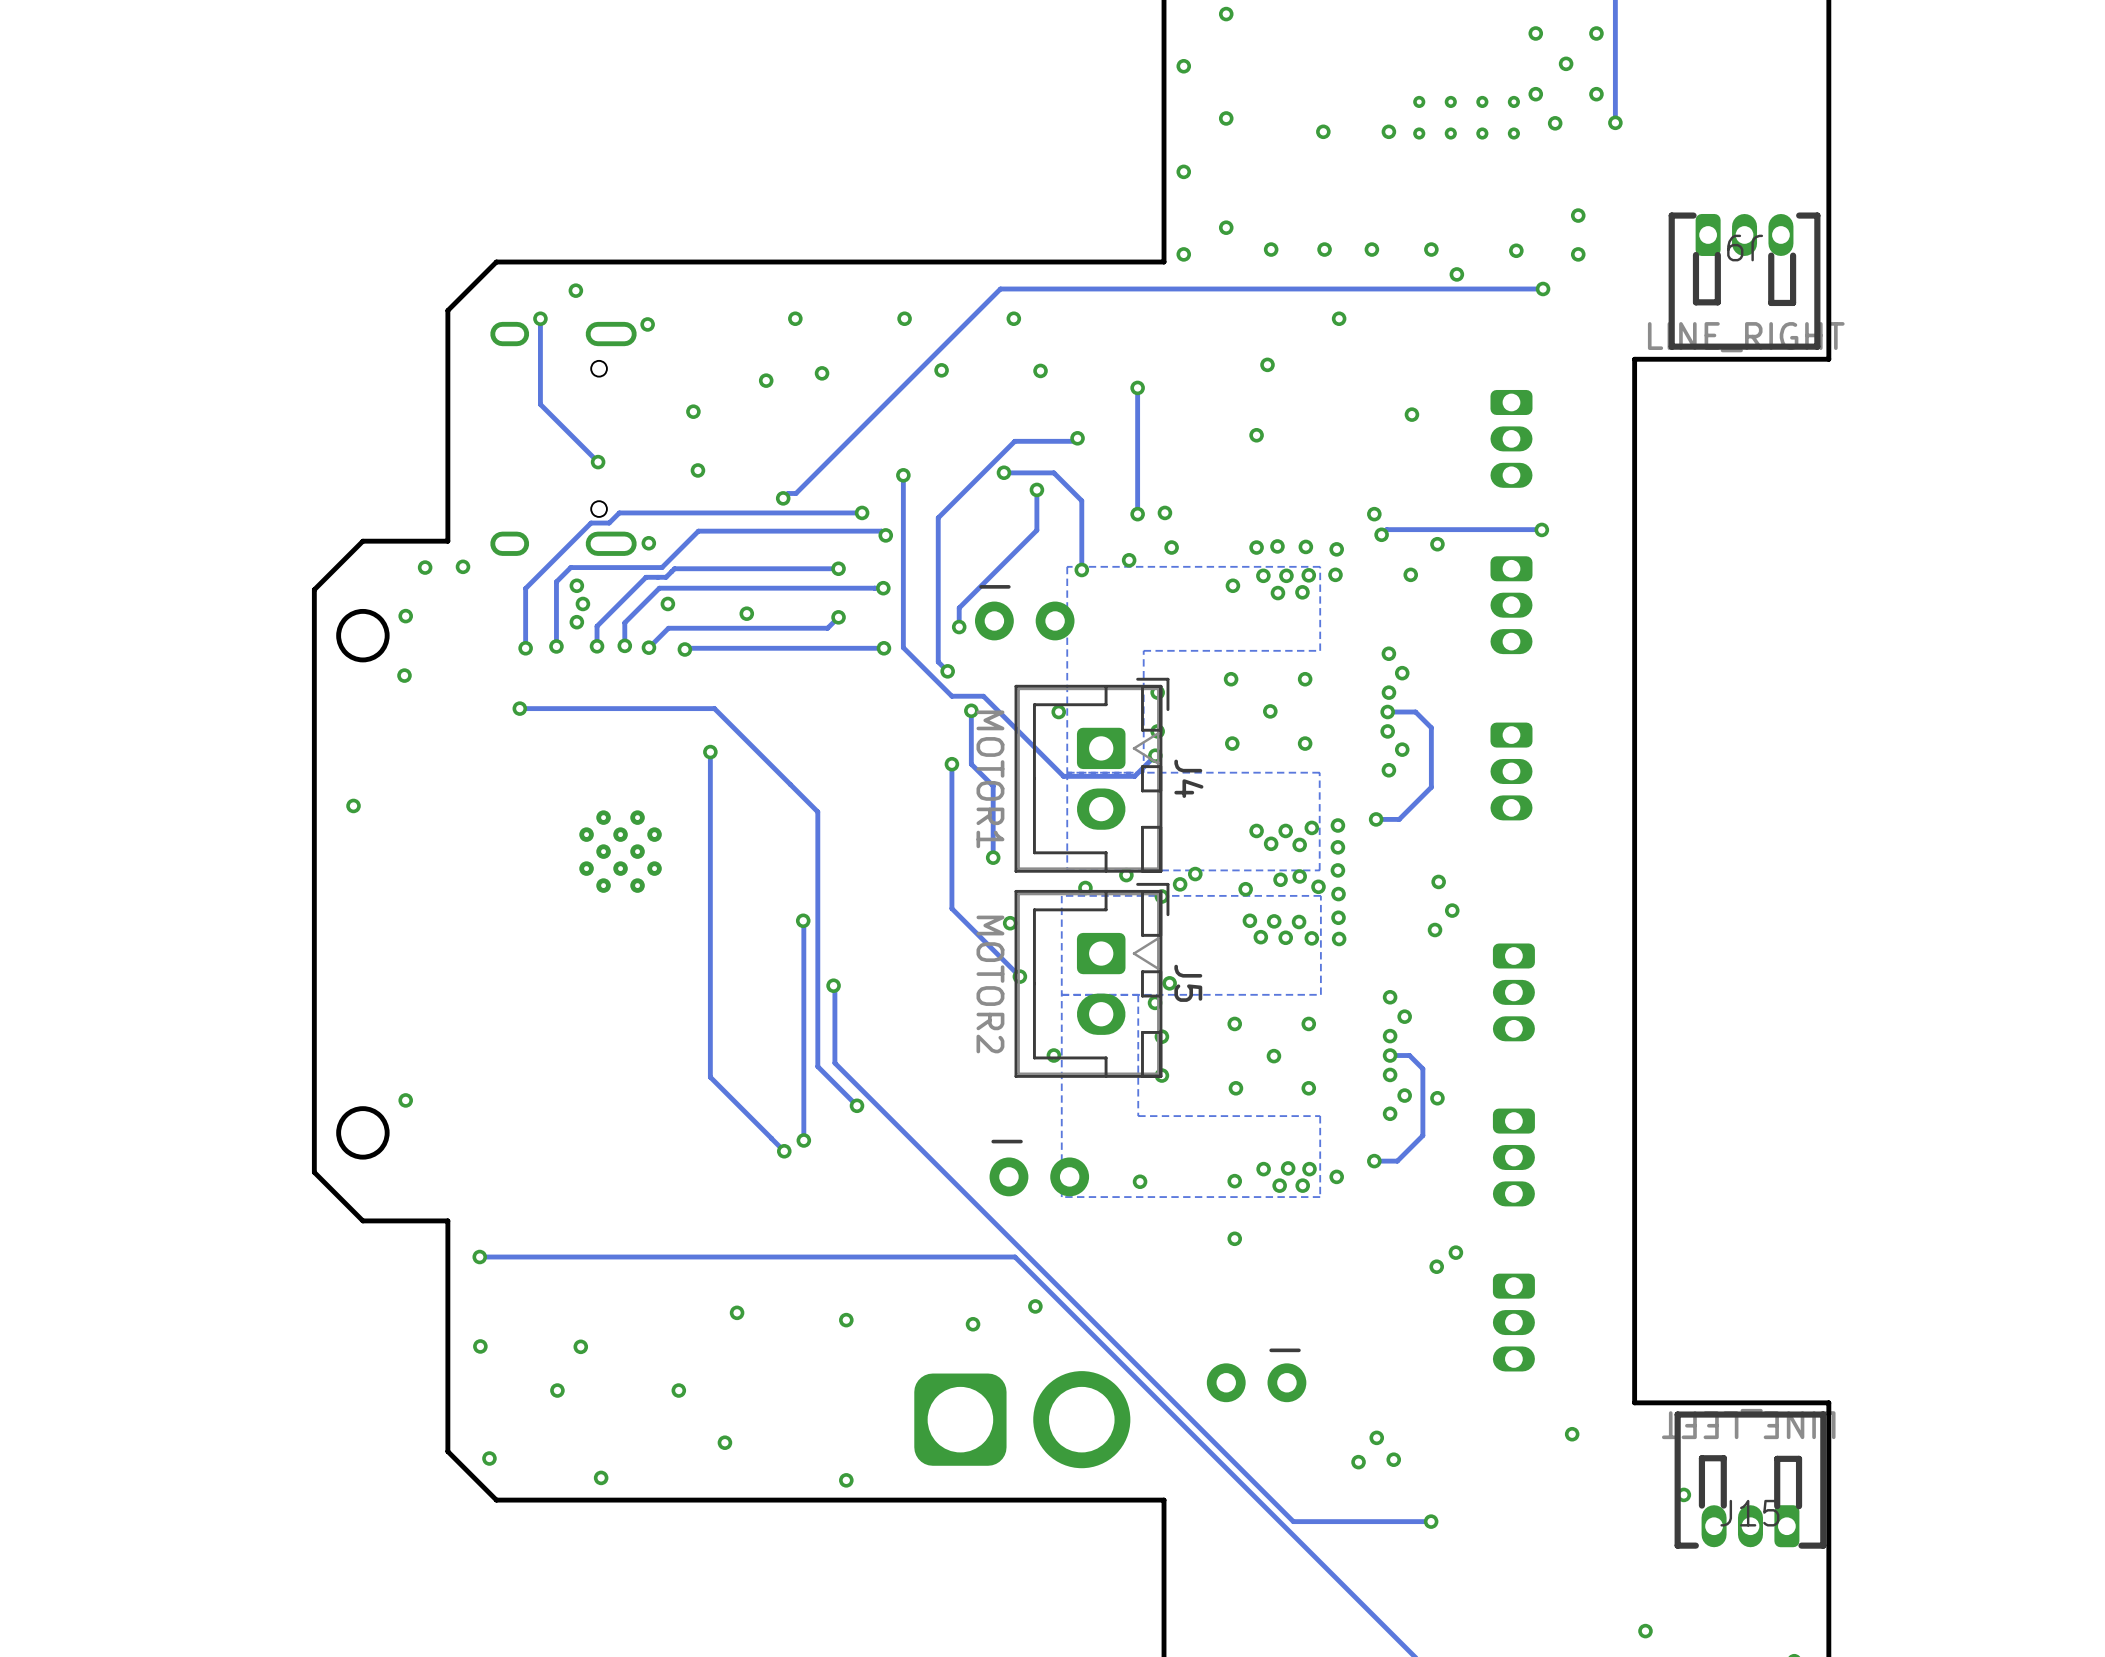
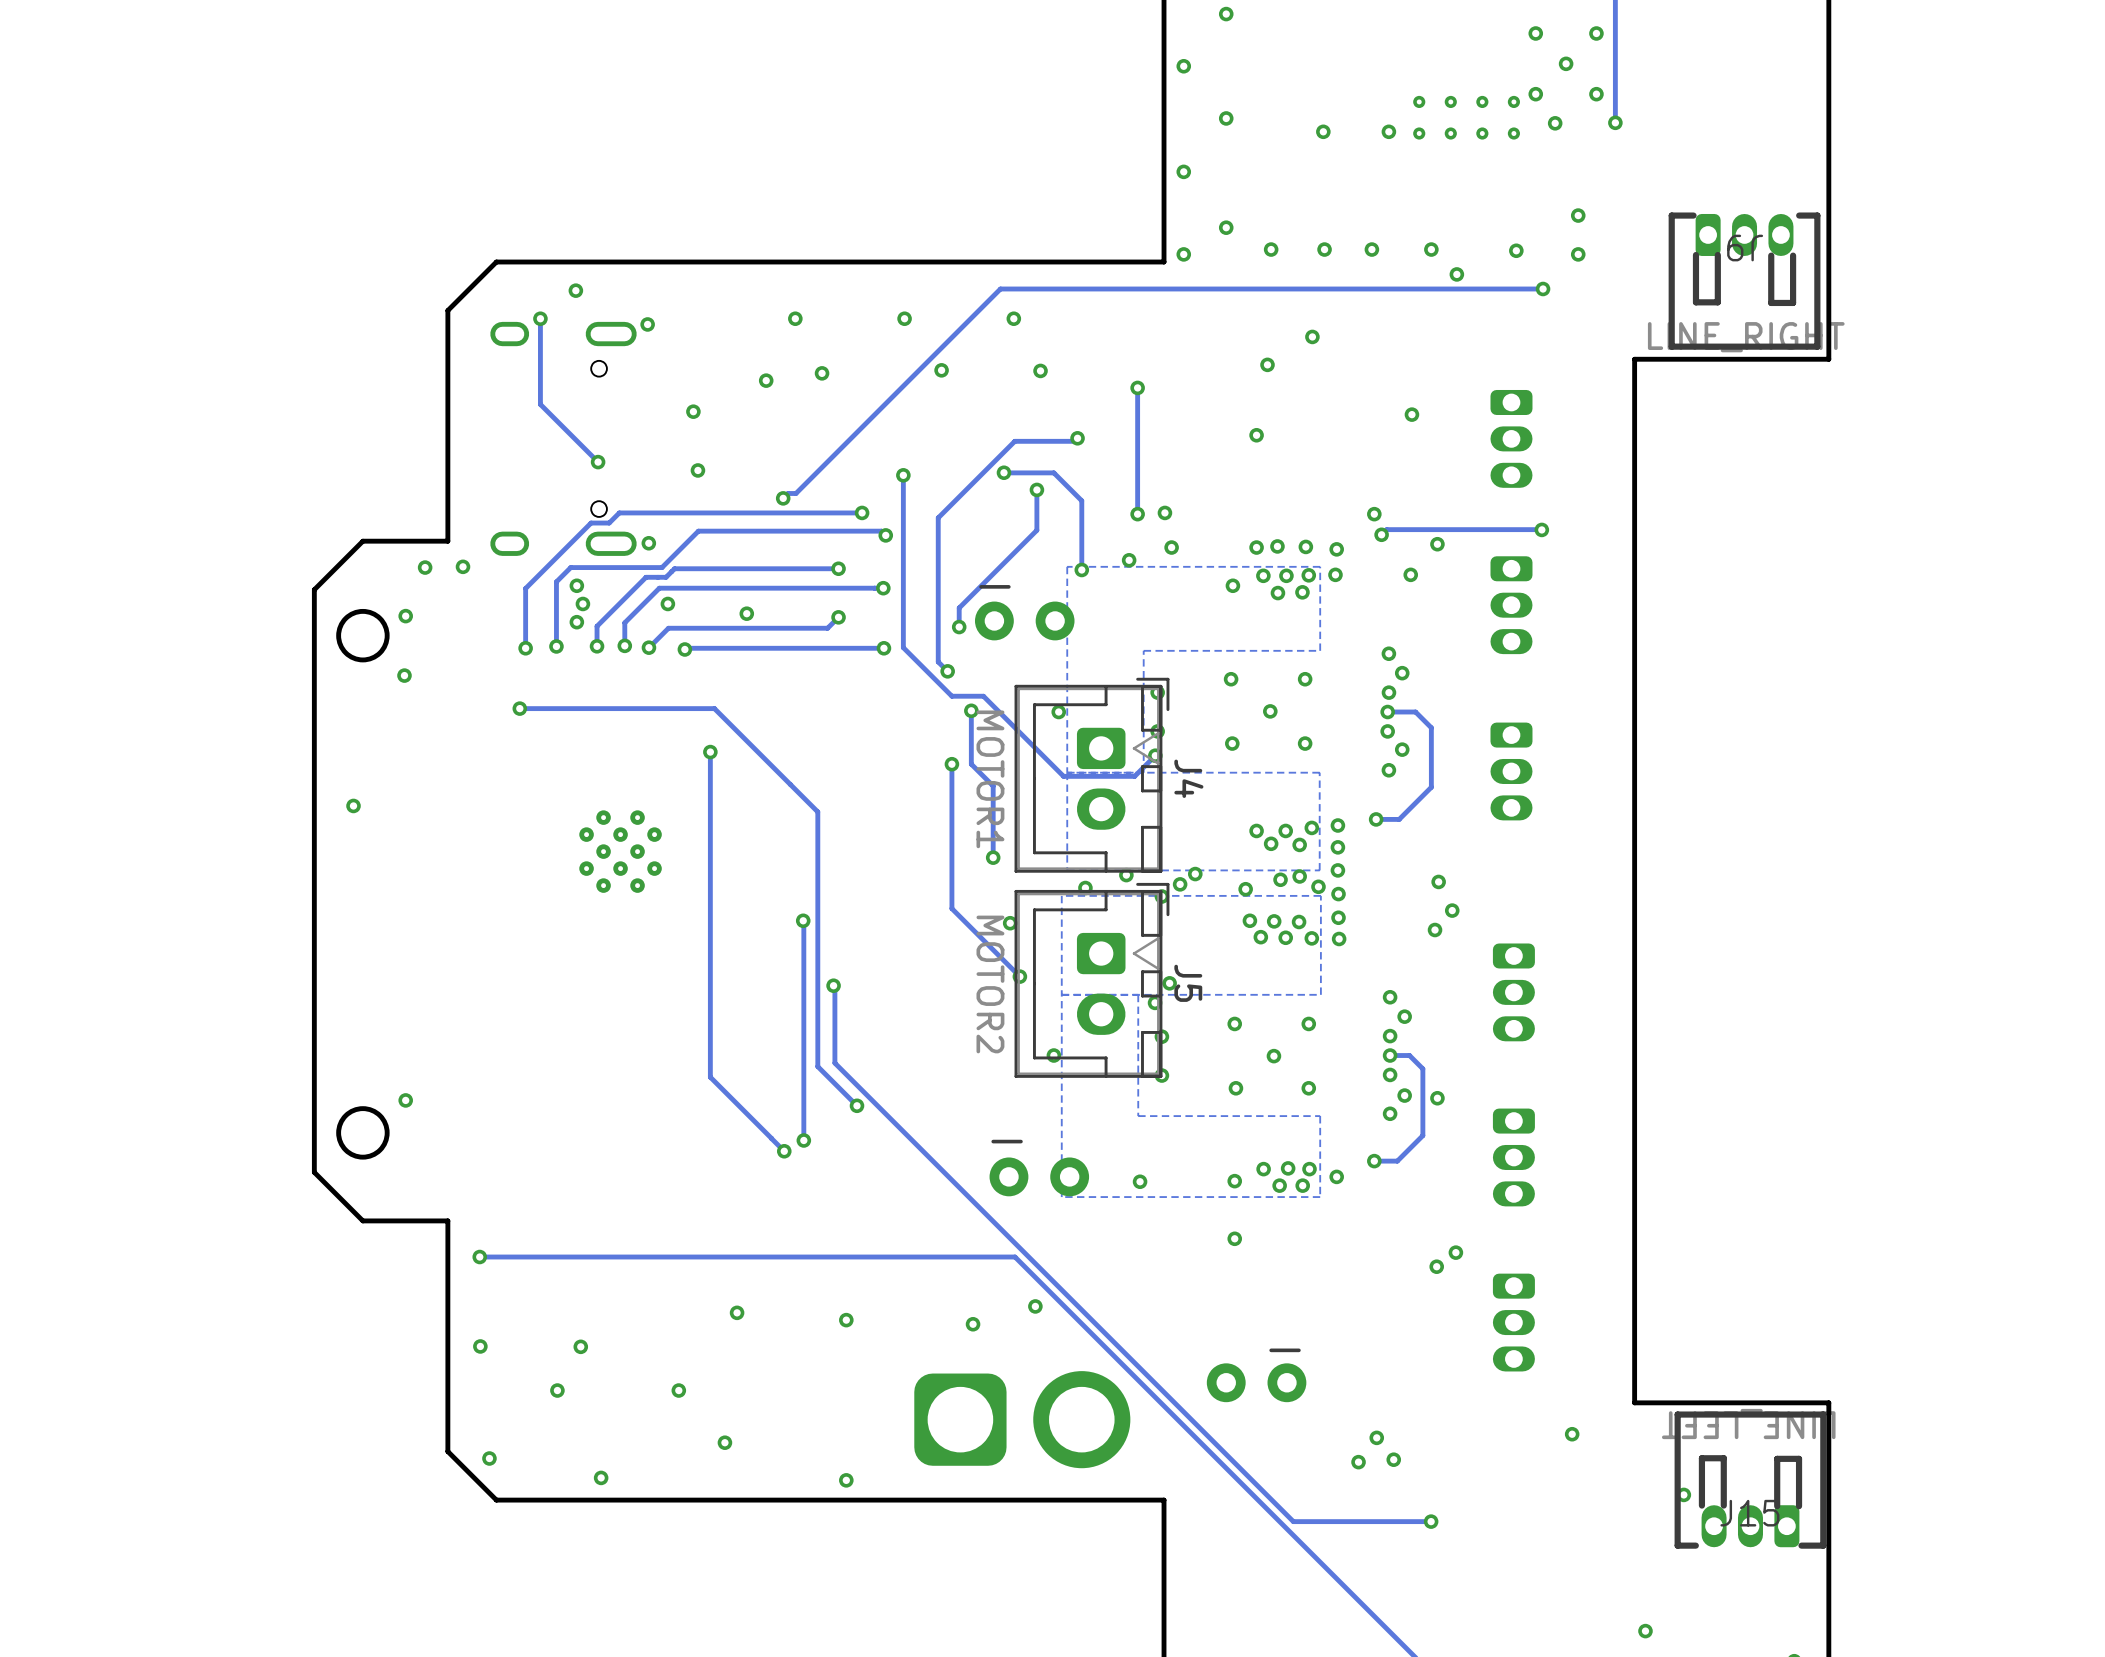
via position: (1339, 318) -> (1312, 336)

